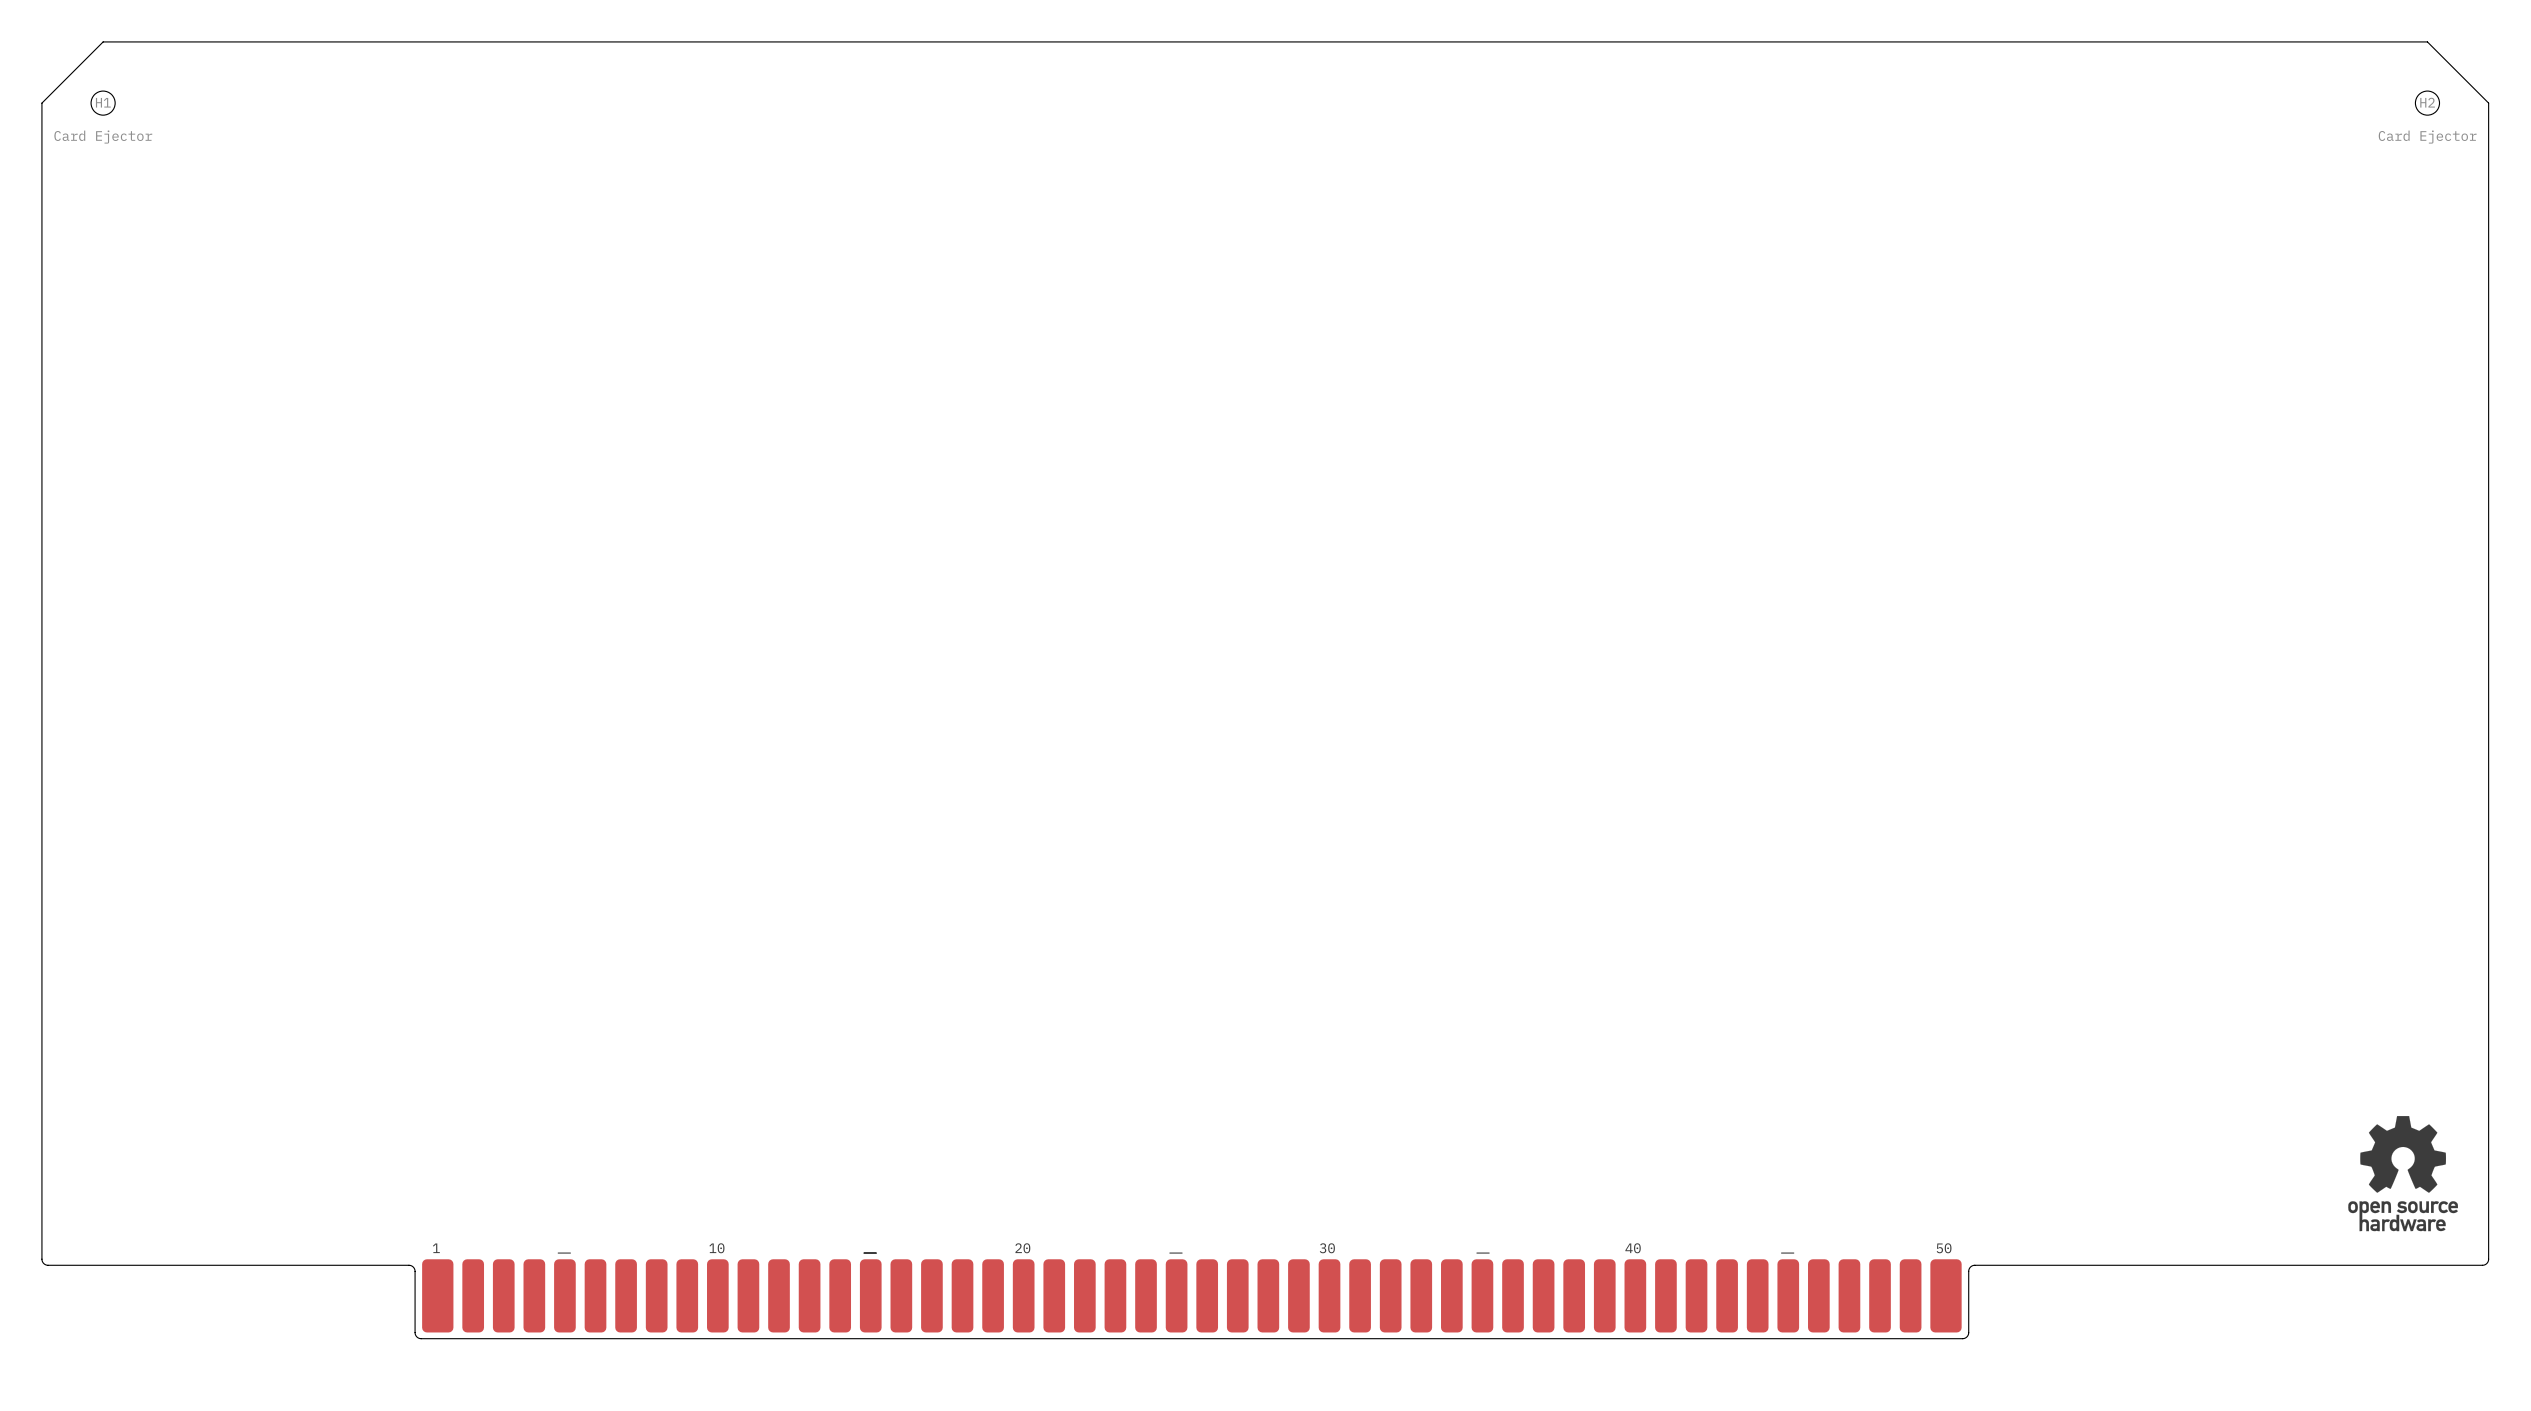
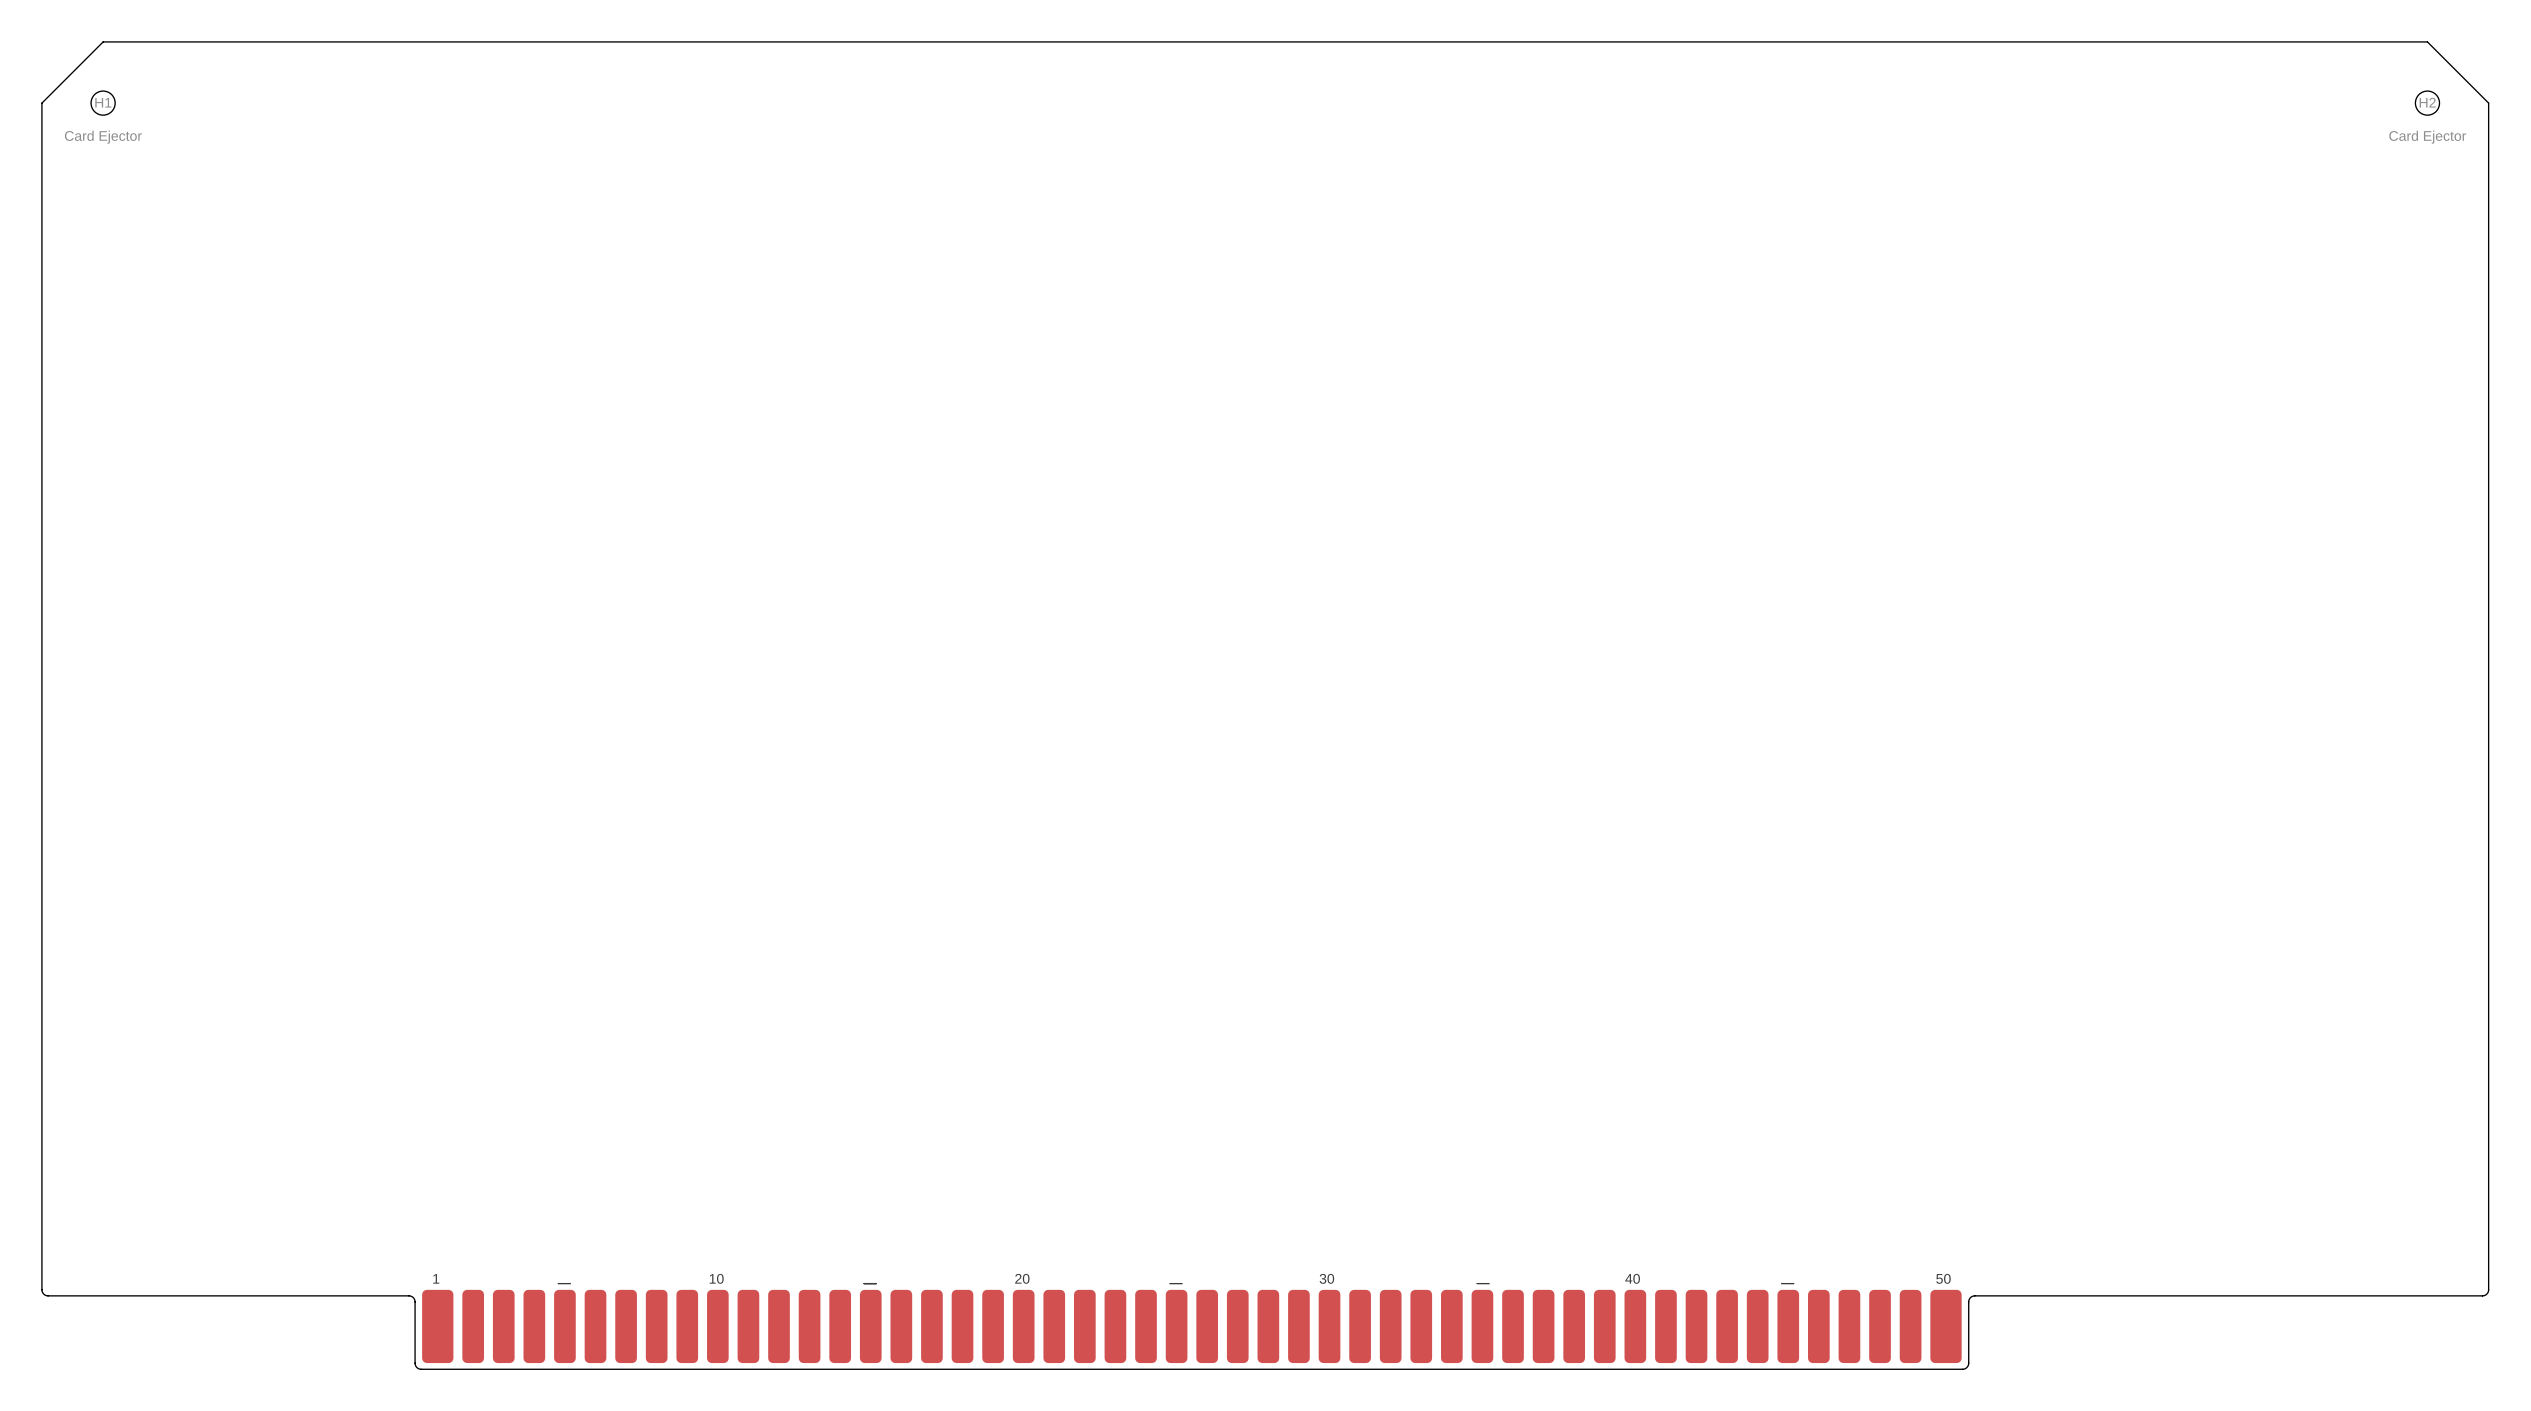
drawing: [2348, 1116, 2458, 1232] -> none
text position: 1 (436, 1248) -> 1 (436, 1278)
text position: 10 (716, 1248) -> 10 (716, 1278)
text position: 20 (1022, 1248) -> 20 (1022, 1278)
text position: 30 (1327, 1248) -> 30 (1326, 1278)
text position: 40 (1633, 1248) -> 40 (1632, 1278)
text position: 50 (1944, 1248) -> 50 (1943, 1278)
line: (558, 1253) (570, 1253) -> (558, 1283) (570, 1283)
line: (864, 1253) (876, 1253) -> (864, 1283) (876, 1283)
line: (1169, 1253) (1182, 1253) -> (1169, 1283) (1182, 1283)
line: (1476, 1253) (1489, 1253) -> (1476, 1283) (1489, 1283)
line: (1781, 1253) (1793, 1253) -> (1781, 1283) (1793, 1283)
board edge: (41, 1259) (43, 1263) (48, 1265) (409, 1265) (415, 1270) (415, 1301) -> (41, 1259) (41, 1290) (47, 1295) (408, 1295) (413, 1297) (415, 1301)
board edge: (2488, 1259) (2486, 1263) (2482, 1265) (1974, 1265) (1968, 1270) (1968, 1301) -> (2488, 1259) (2488, 1290) (2483, 1295) (1974, 1295) (1970, 1297) (1968, 1301)
part position: (1191, 1295) -> (1191, 1326)
board edge: (415, 1332) (416, 1336) (421, 1338) (1962, 1338) (1966, 1336) (1968, 1332) -> (415, 1332) (415, 1363) (417, 1367) (421, 1369) (1962, 1369) (1966, 1367) (1968, 1363) (1968, 1332)

